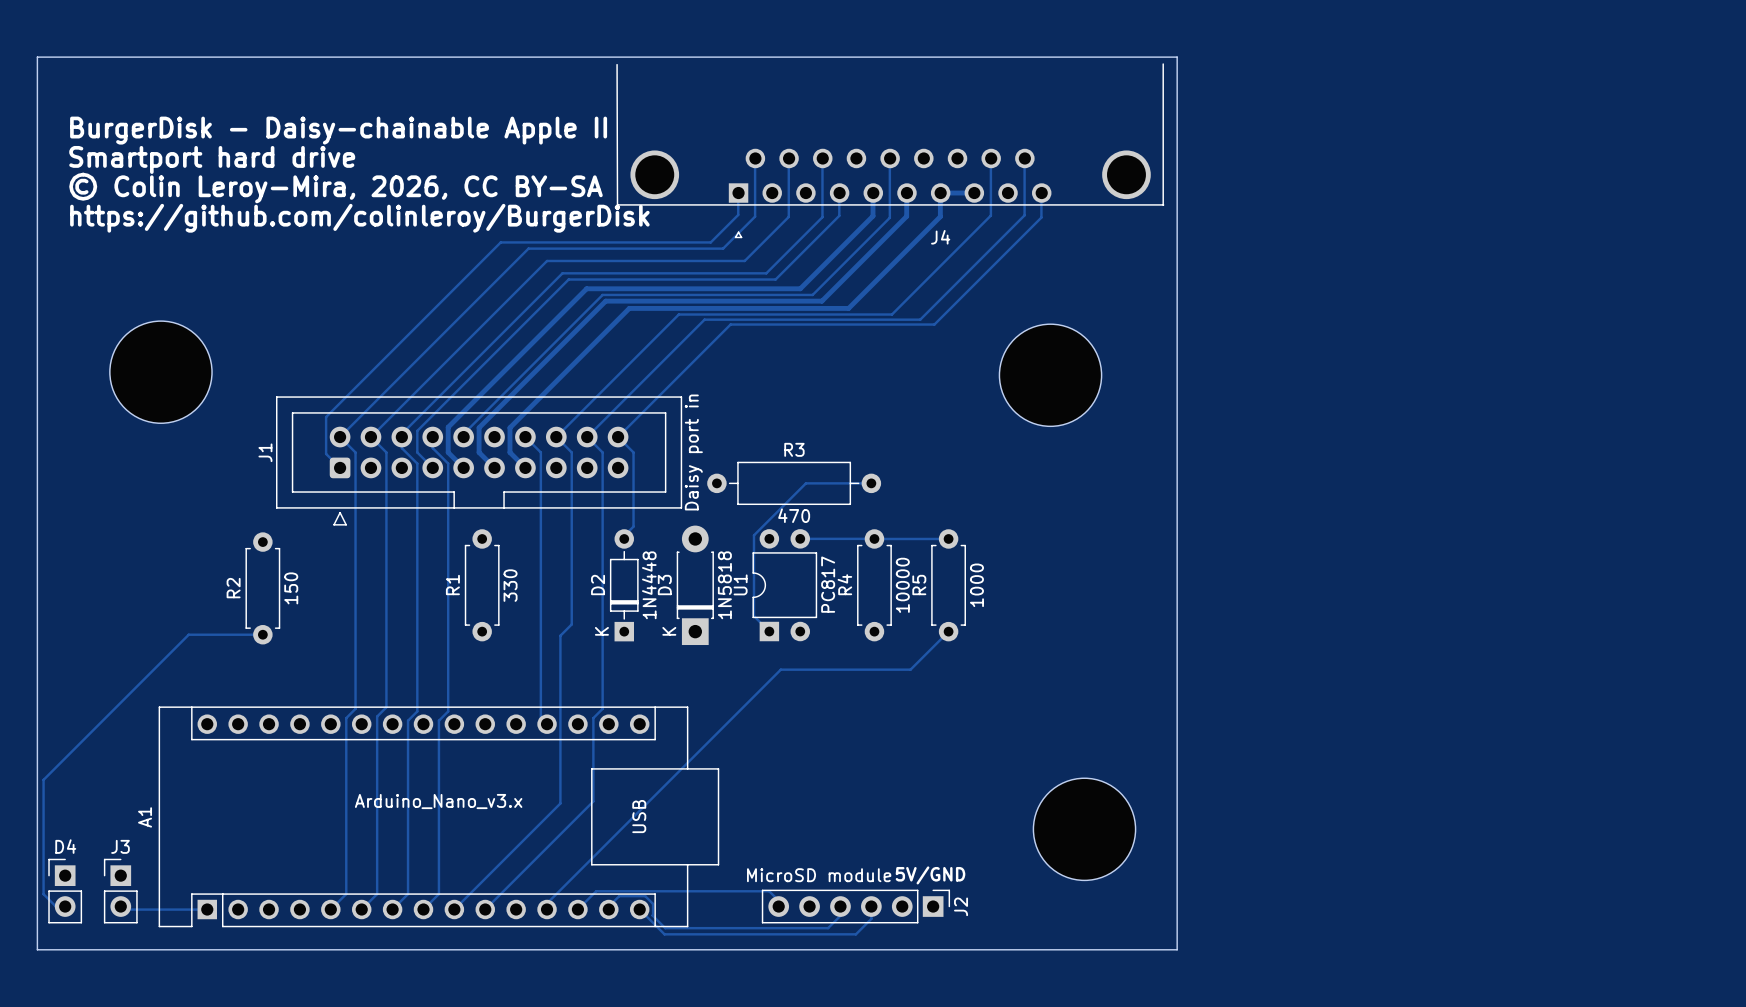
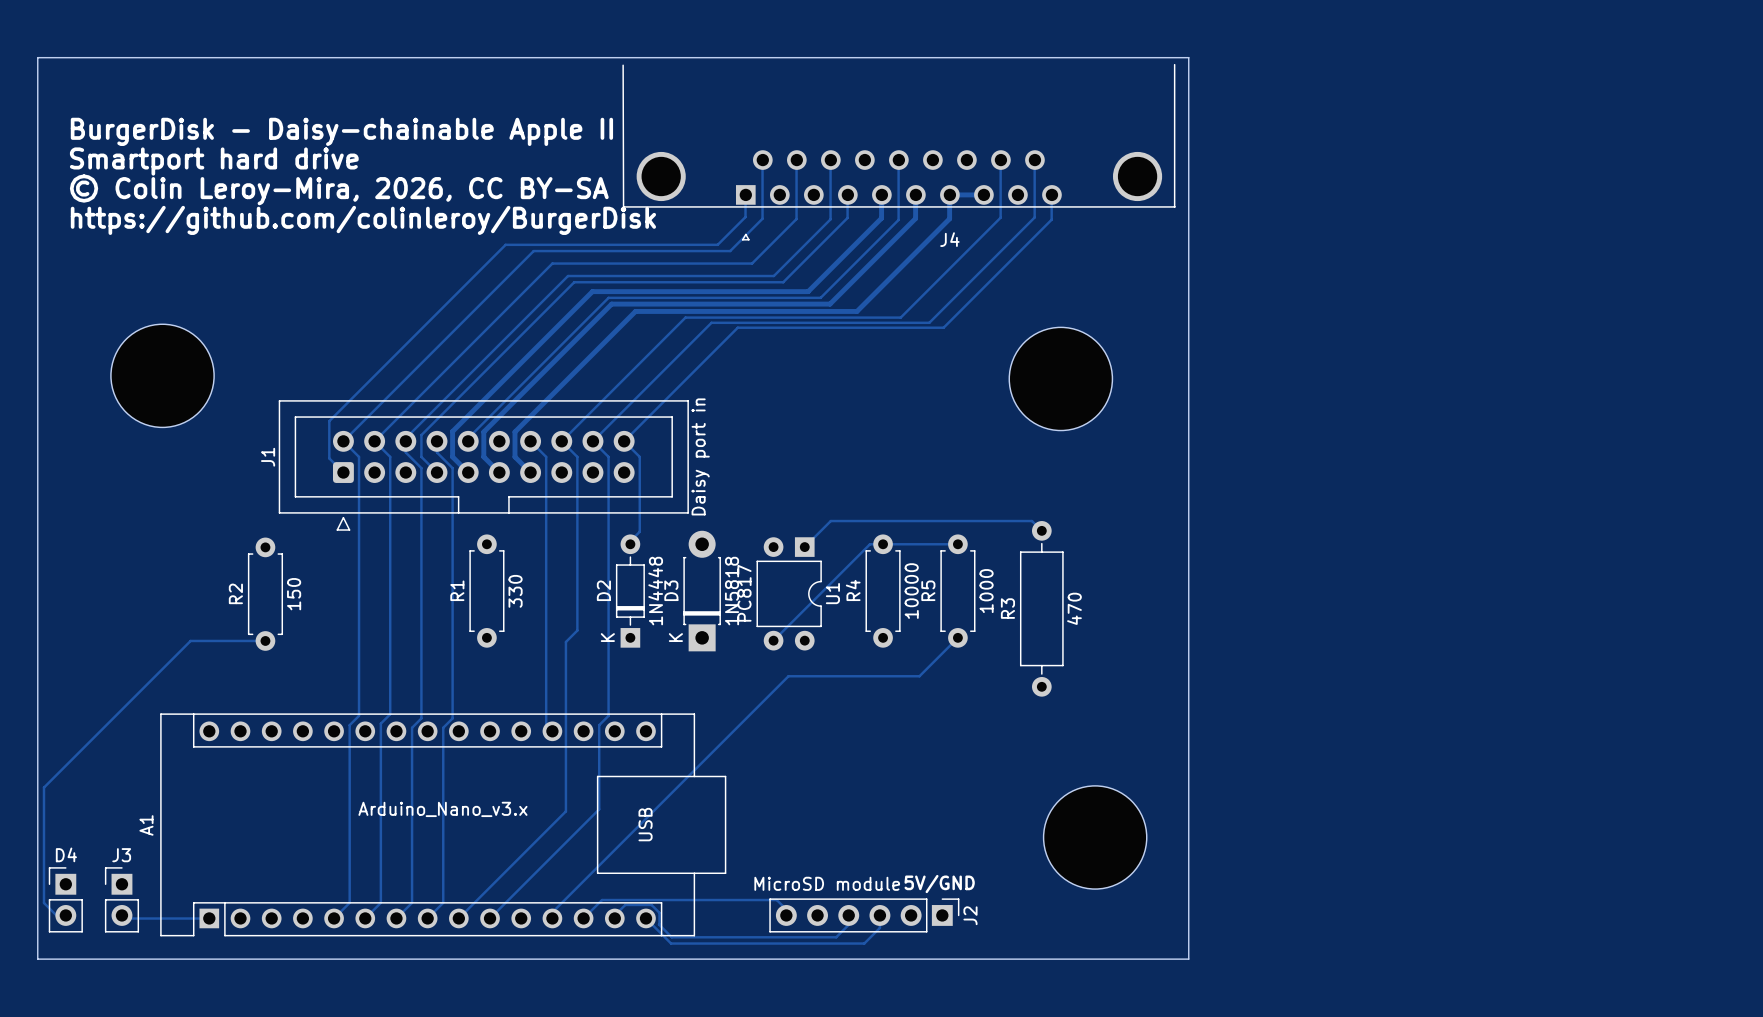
R3 name position: R3 (794, 449) -> R3 (1007, 608)
R3 rotation: 0° (794, 483) -> 90° clockwise (1041, 608)
R3 position: (794, 483) -> (1041, 608)
track: (871, 483) (805, 483) (753, 535) (753, 616) (769, 631) -> none
R3 value position: 470 (794, 515) -> 470 (1074, 608)
track: none -> (1041, 530) (1032, 521) (830, 521) (804, 547)
track: (800, 538) (874, 538) -> (773, 640) (869, 544) (883, 544)
U1 rotation: 0° (784, 585) -> 180° (789, 593)

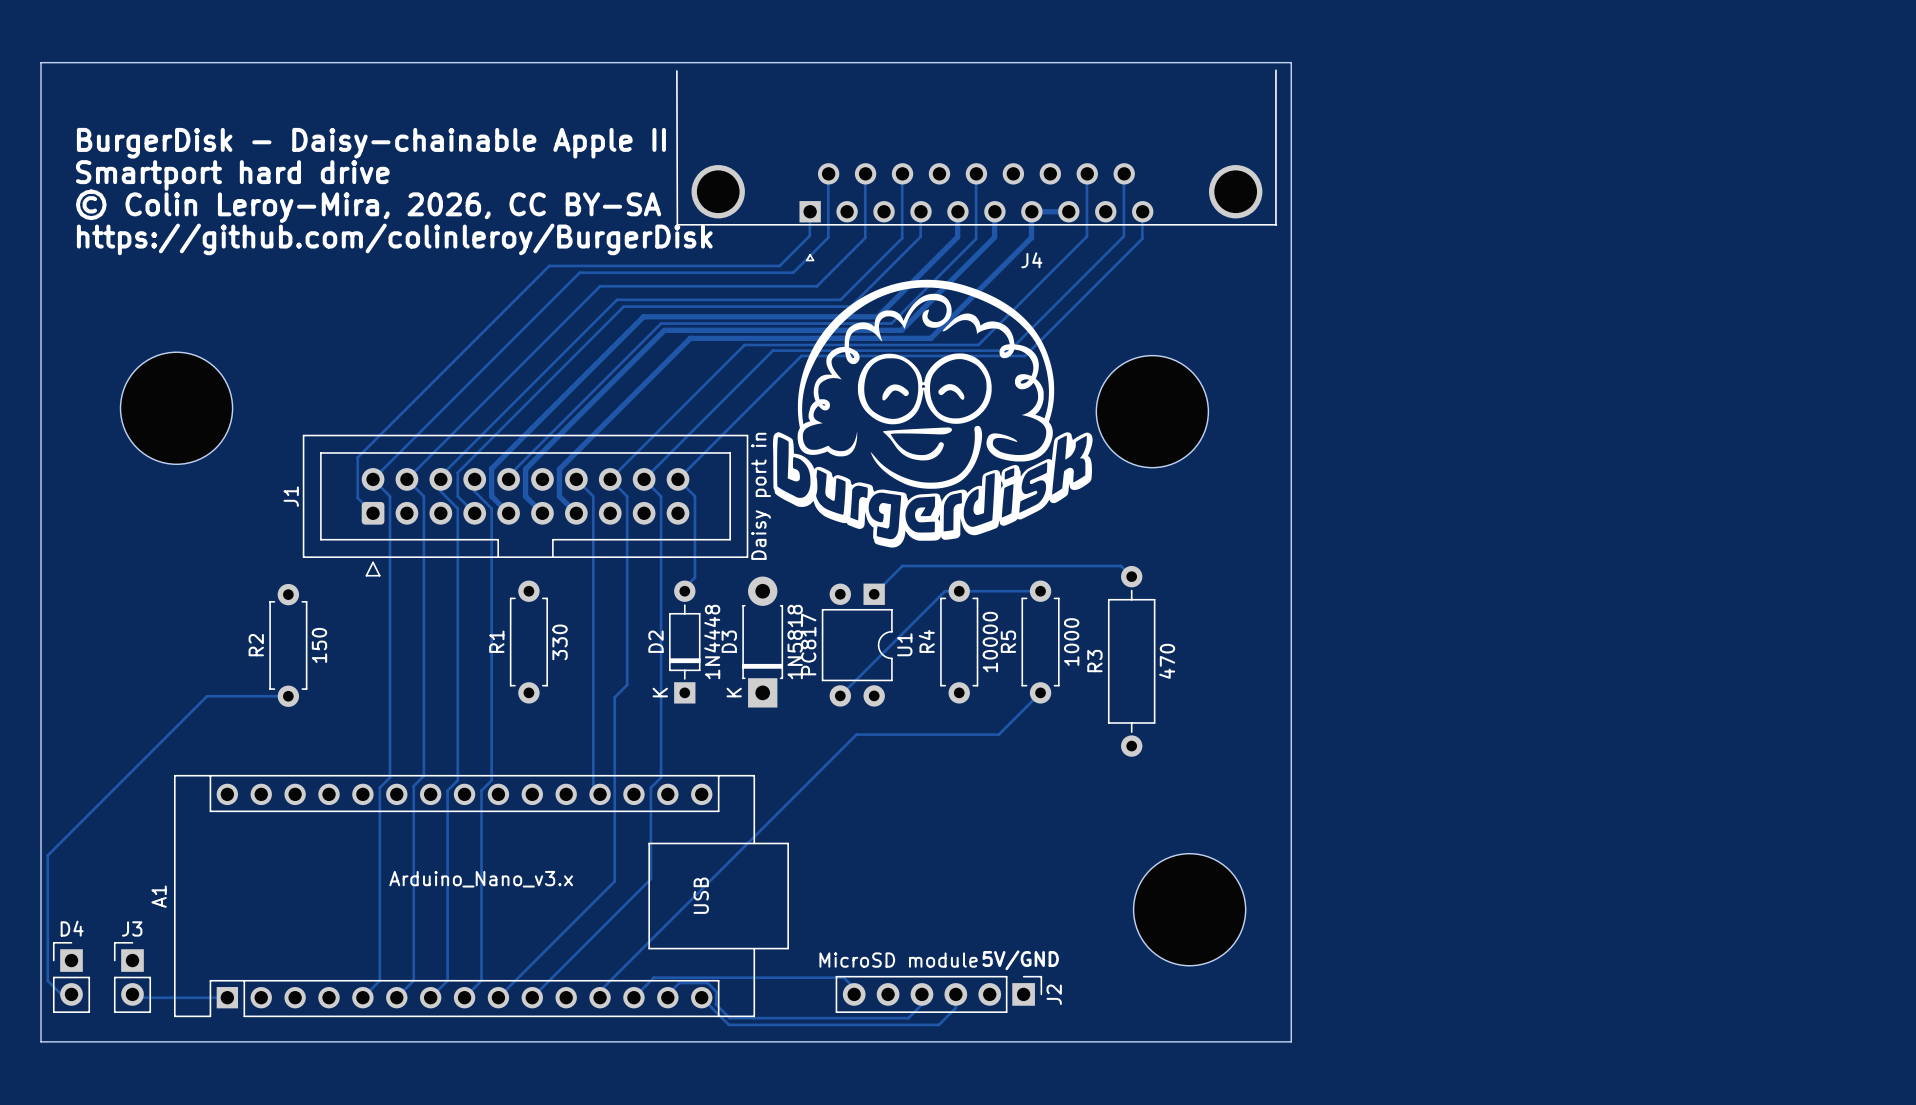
drawing: none -> [772, 279, 1093, 548]

